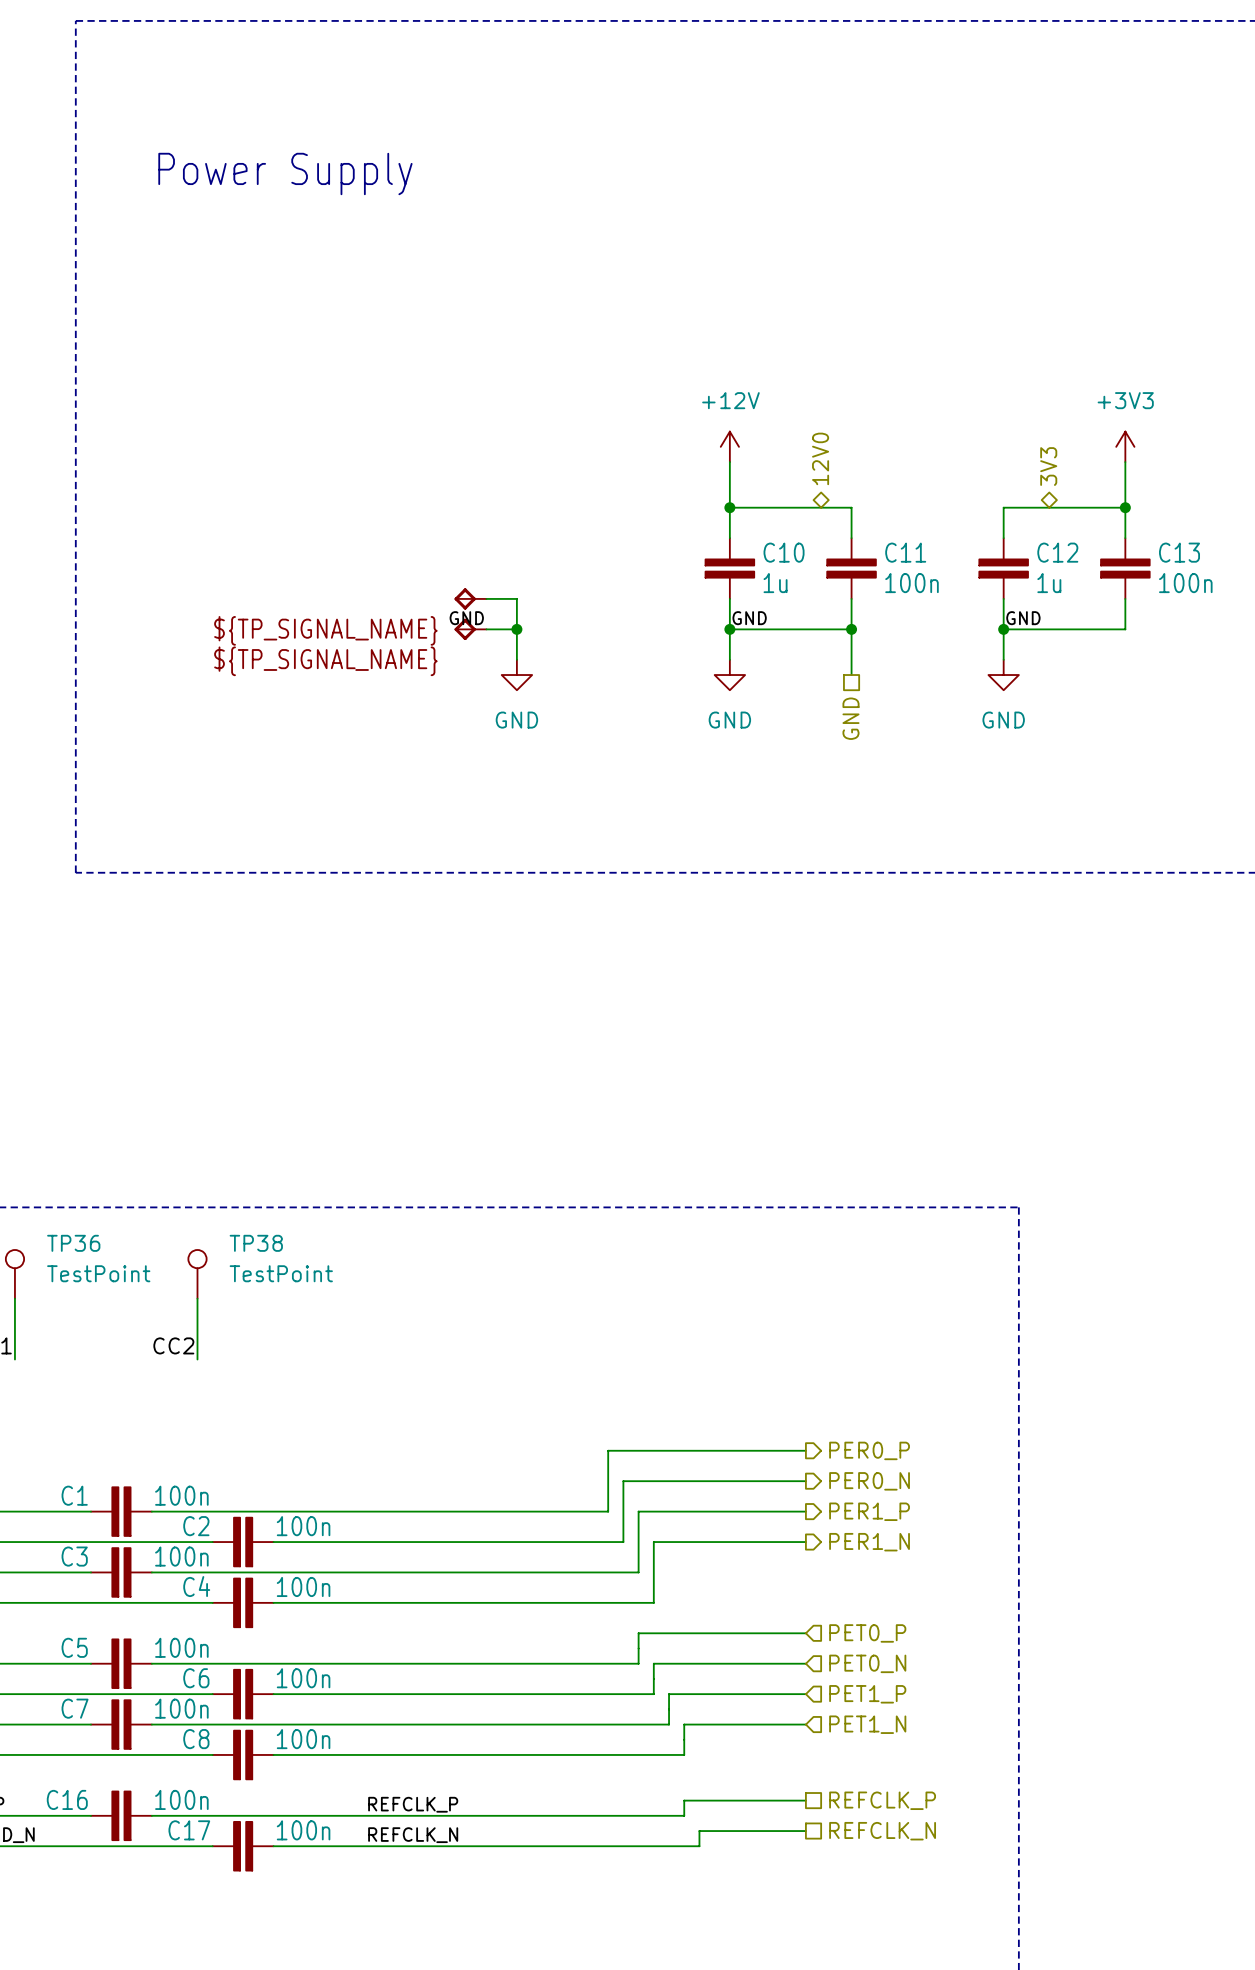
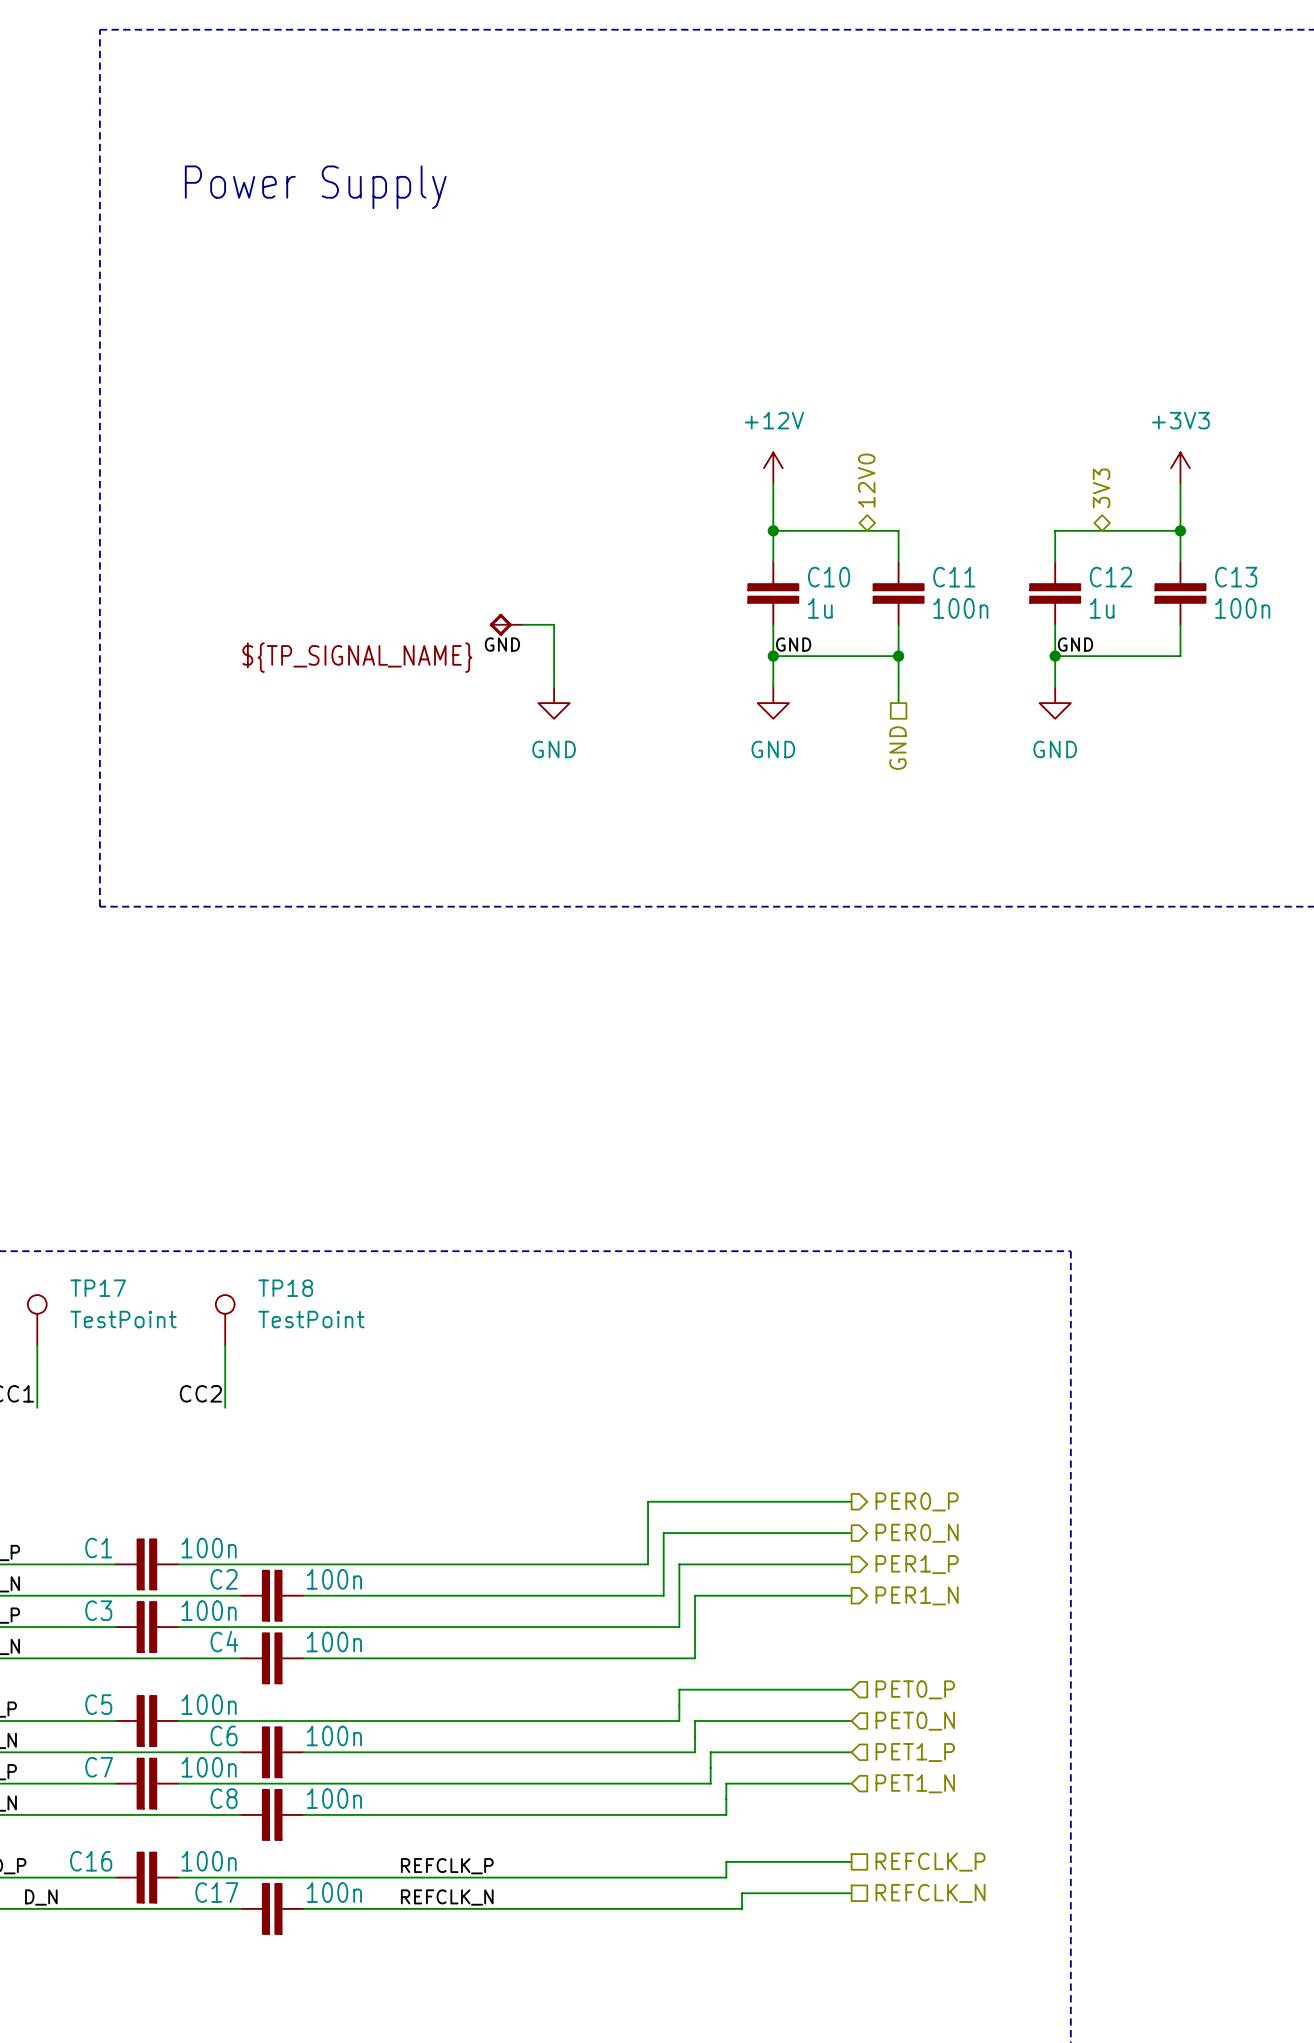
part: (470, 629) -> none
wire: (486, 629) (516, 629) -> none
junction: (516, 629) -> none
TP36 name: TP36 (73, 1243) -> TP17 (98, 1288)
TP38 name: TP38 (256, 1243) -> TP18 (285, 1288)

